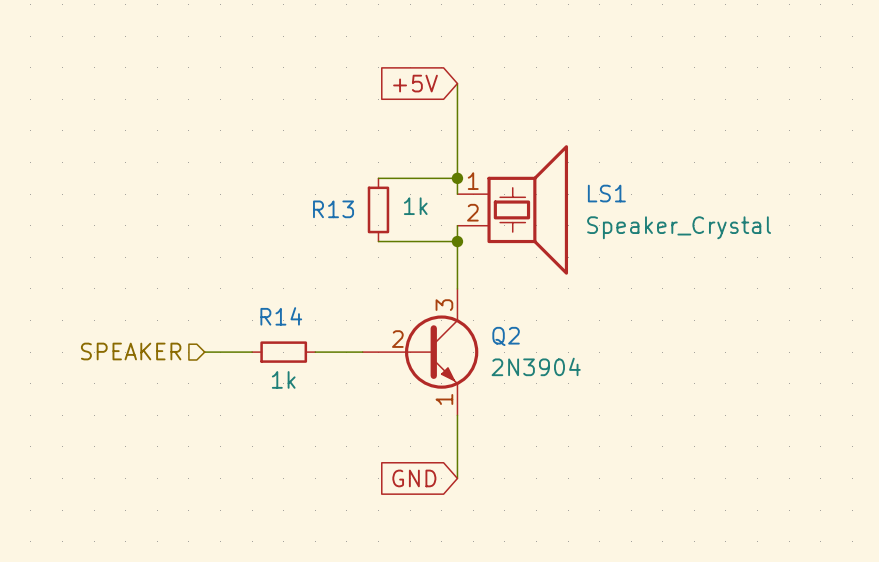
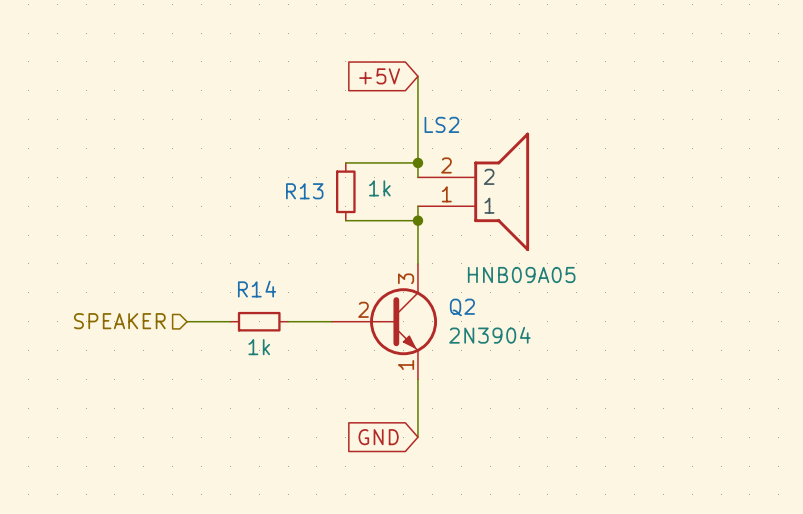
LS1: Speaker_Crystal (512, 209) -> none
LS2: none -> HNB09A05 (473, 191)

